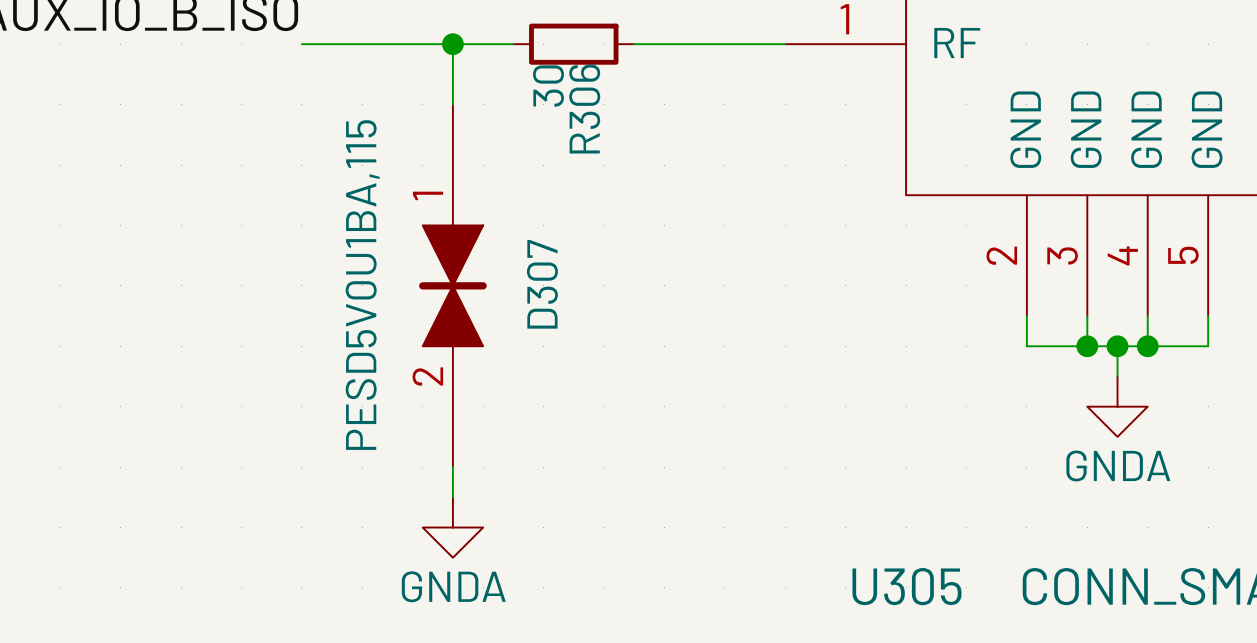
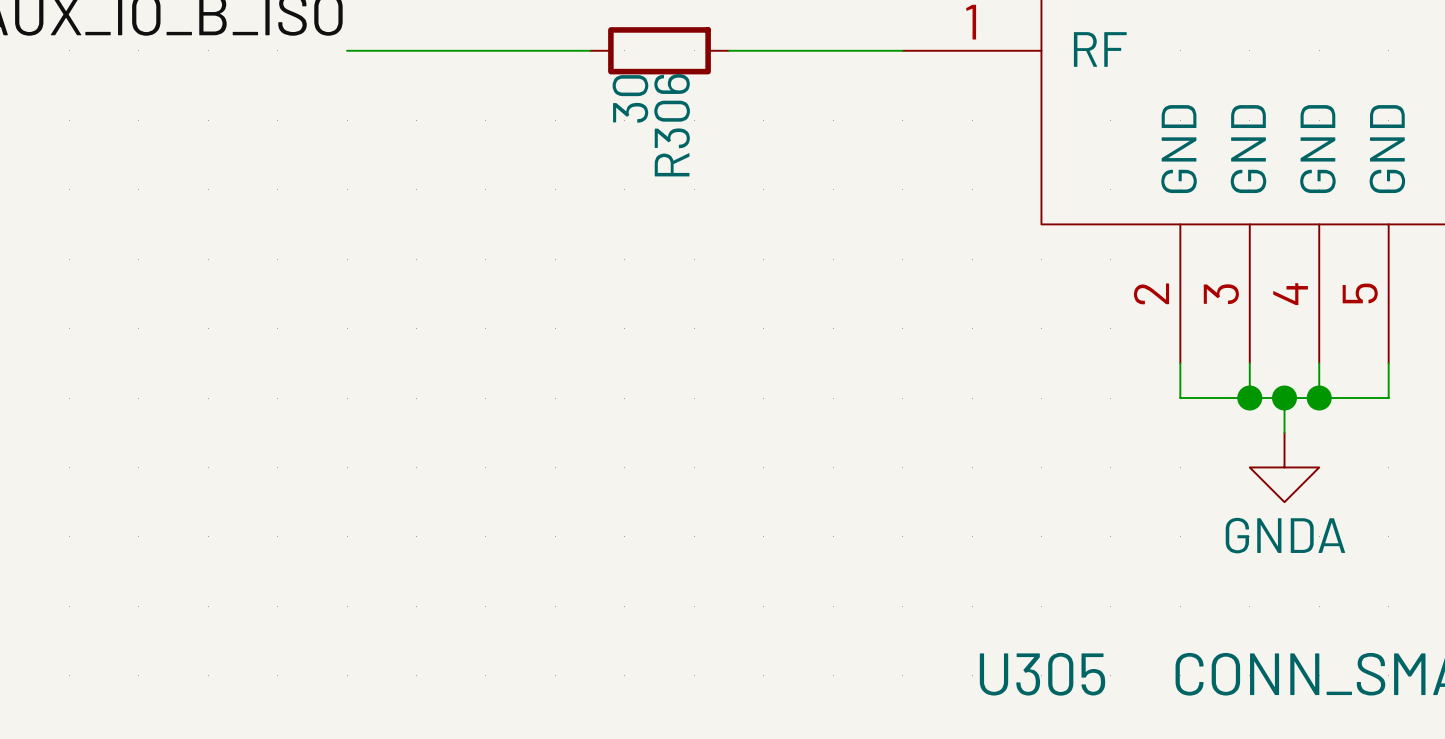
wire: (452, 44) (452, 104) -> none
junction: (452, 44) -> none
D307: PESD5V0U1BA,115 (452, 285) -> none
wire: (452, 467) (452, 497) -> none
power symbol: GNDA (452, 527) -> none

